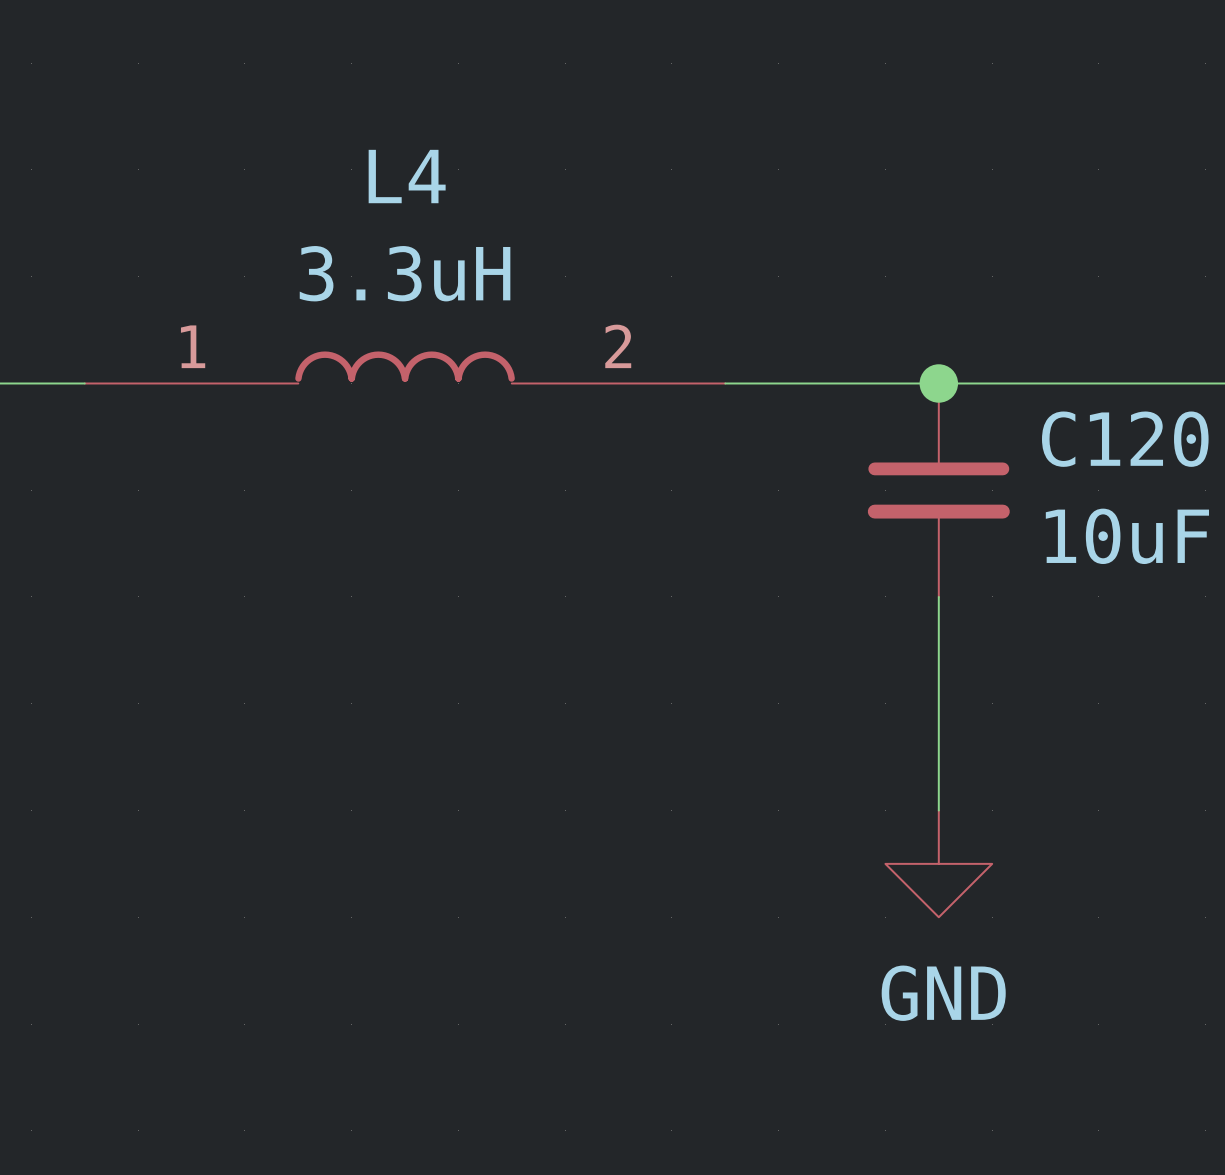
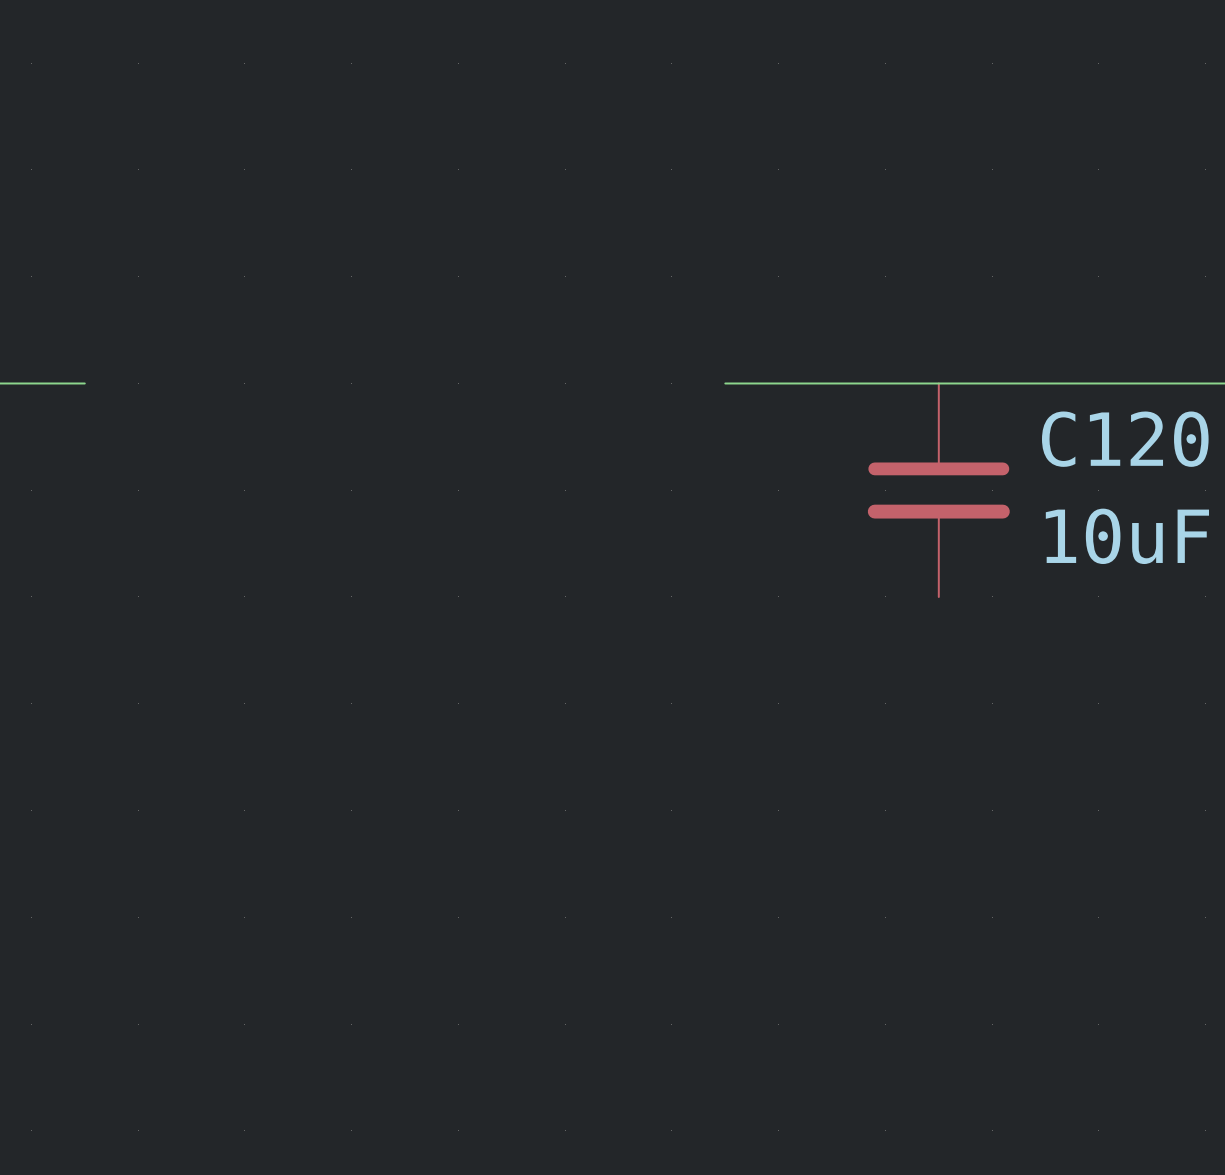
L4: 3.3uH (405, 367) -> none
junction: (938, 383) -> none
wire: (938, 596) (938, 810) -> none
power symbol: GND (938, 863) -> none

